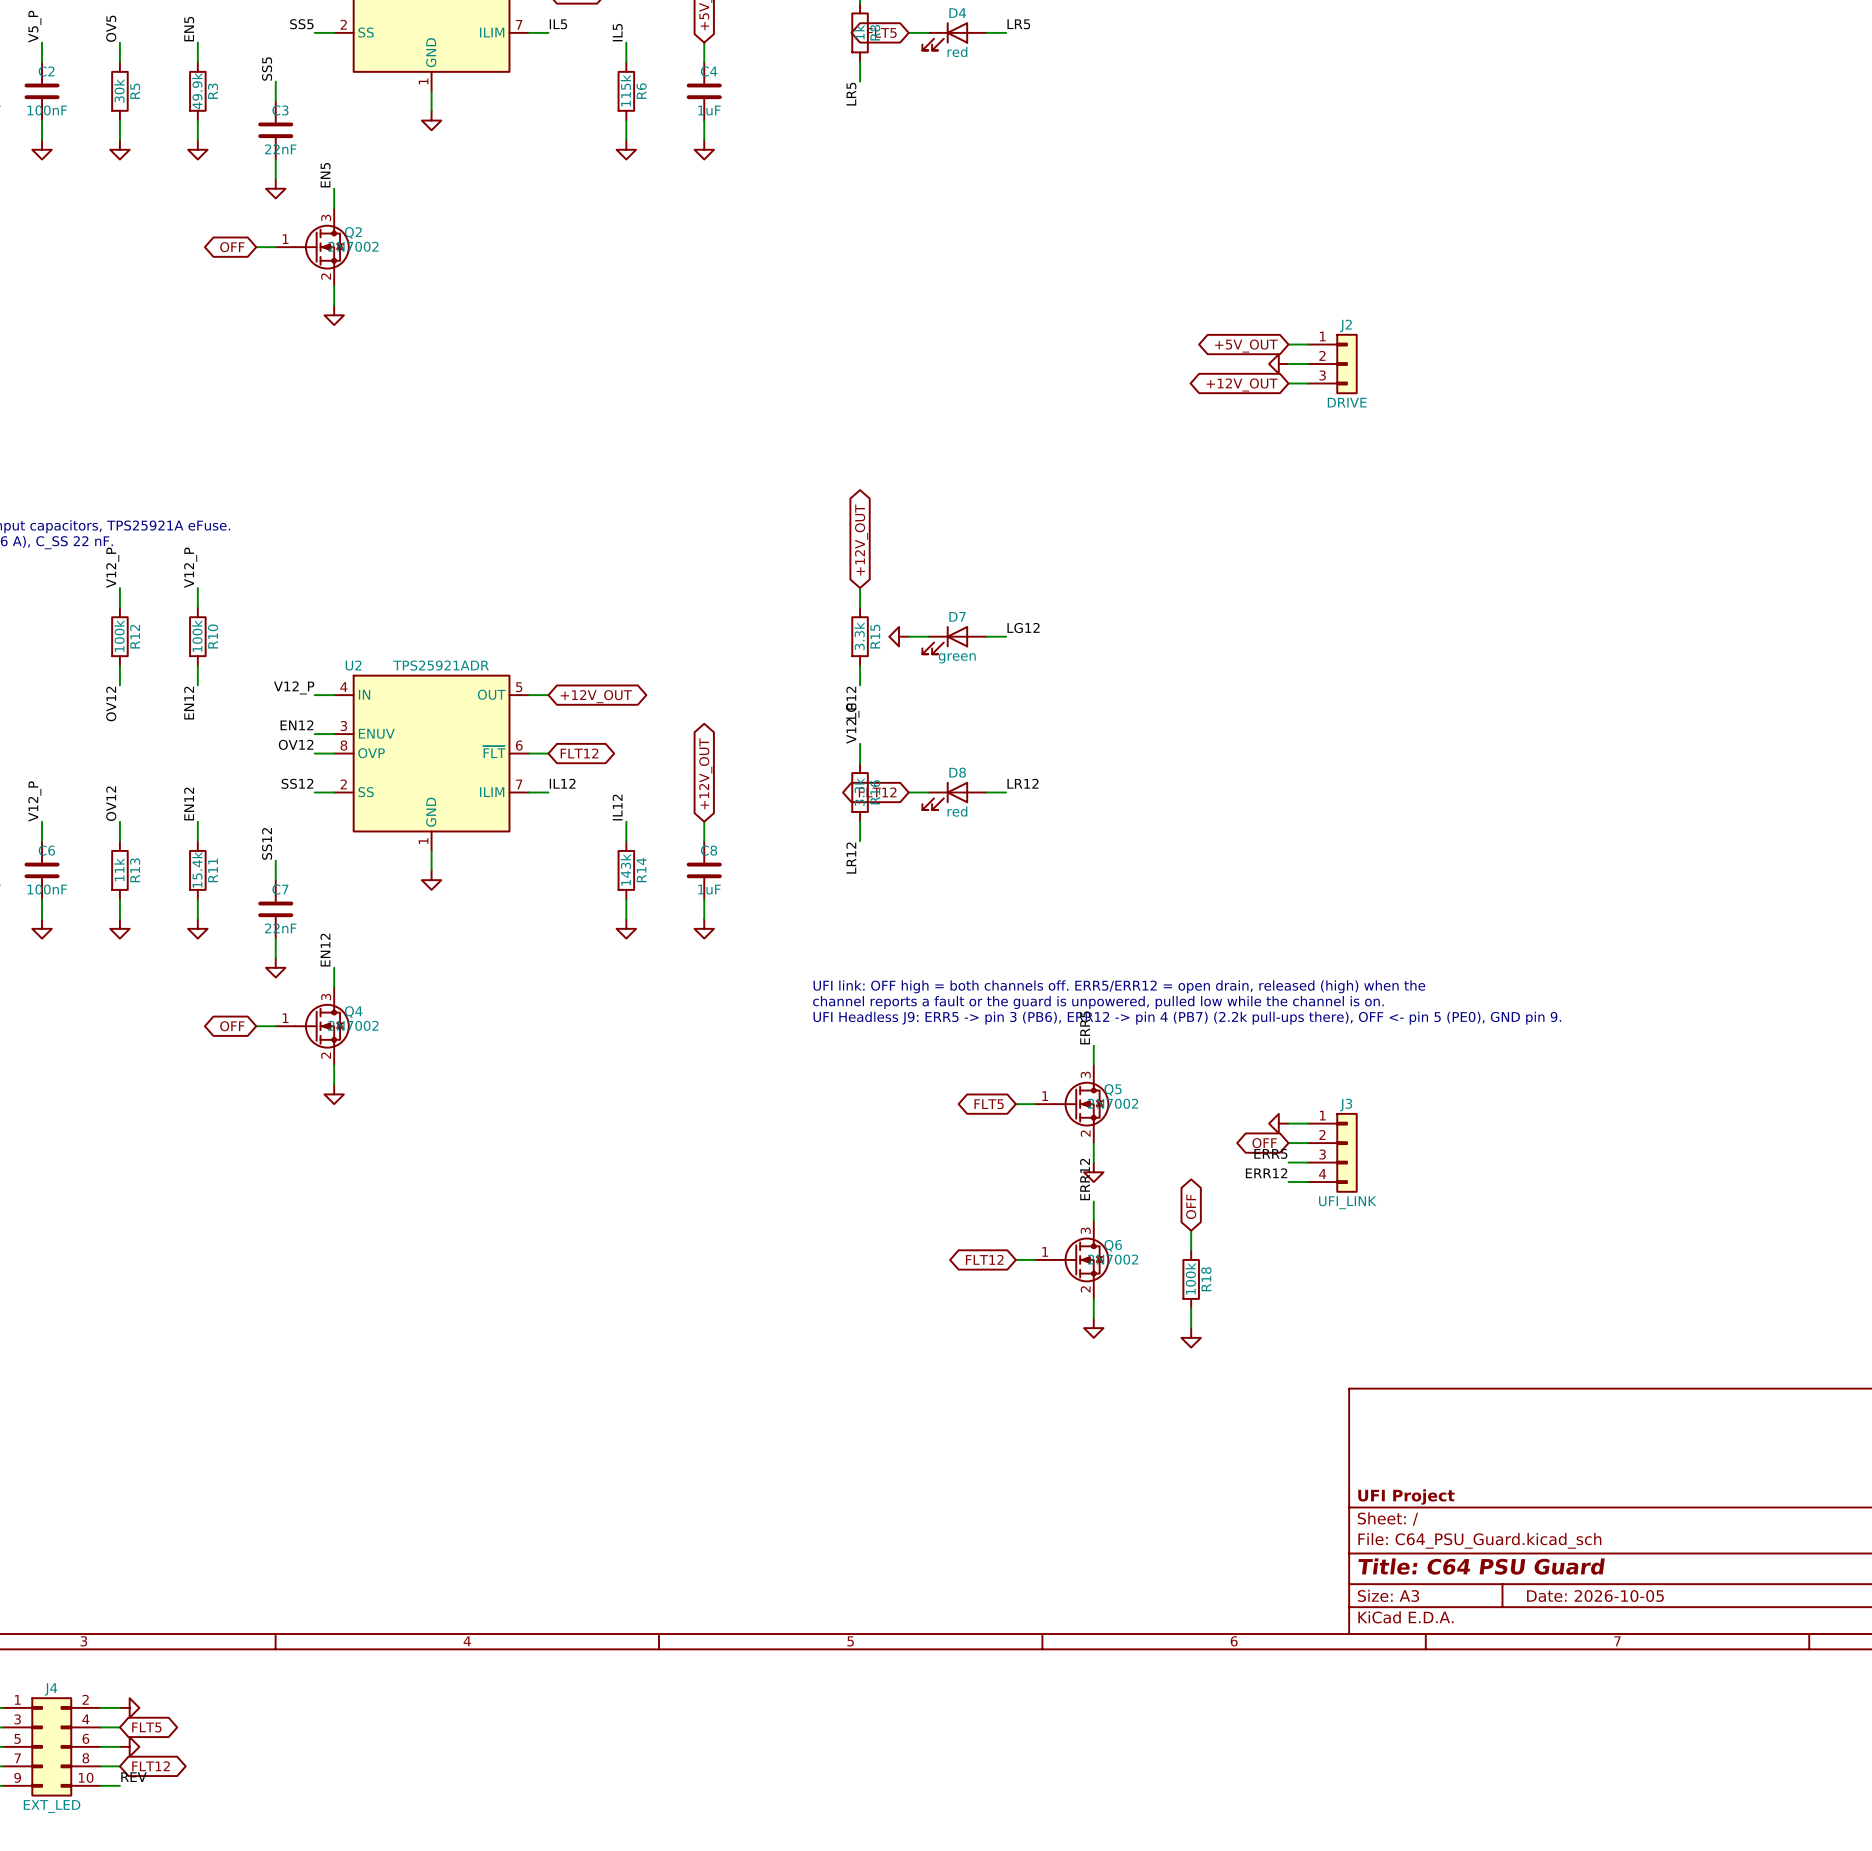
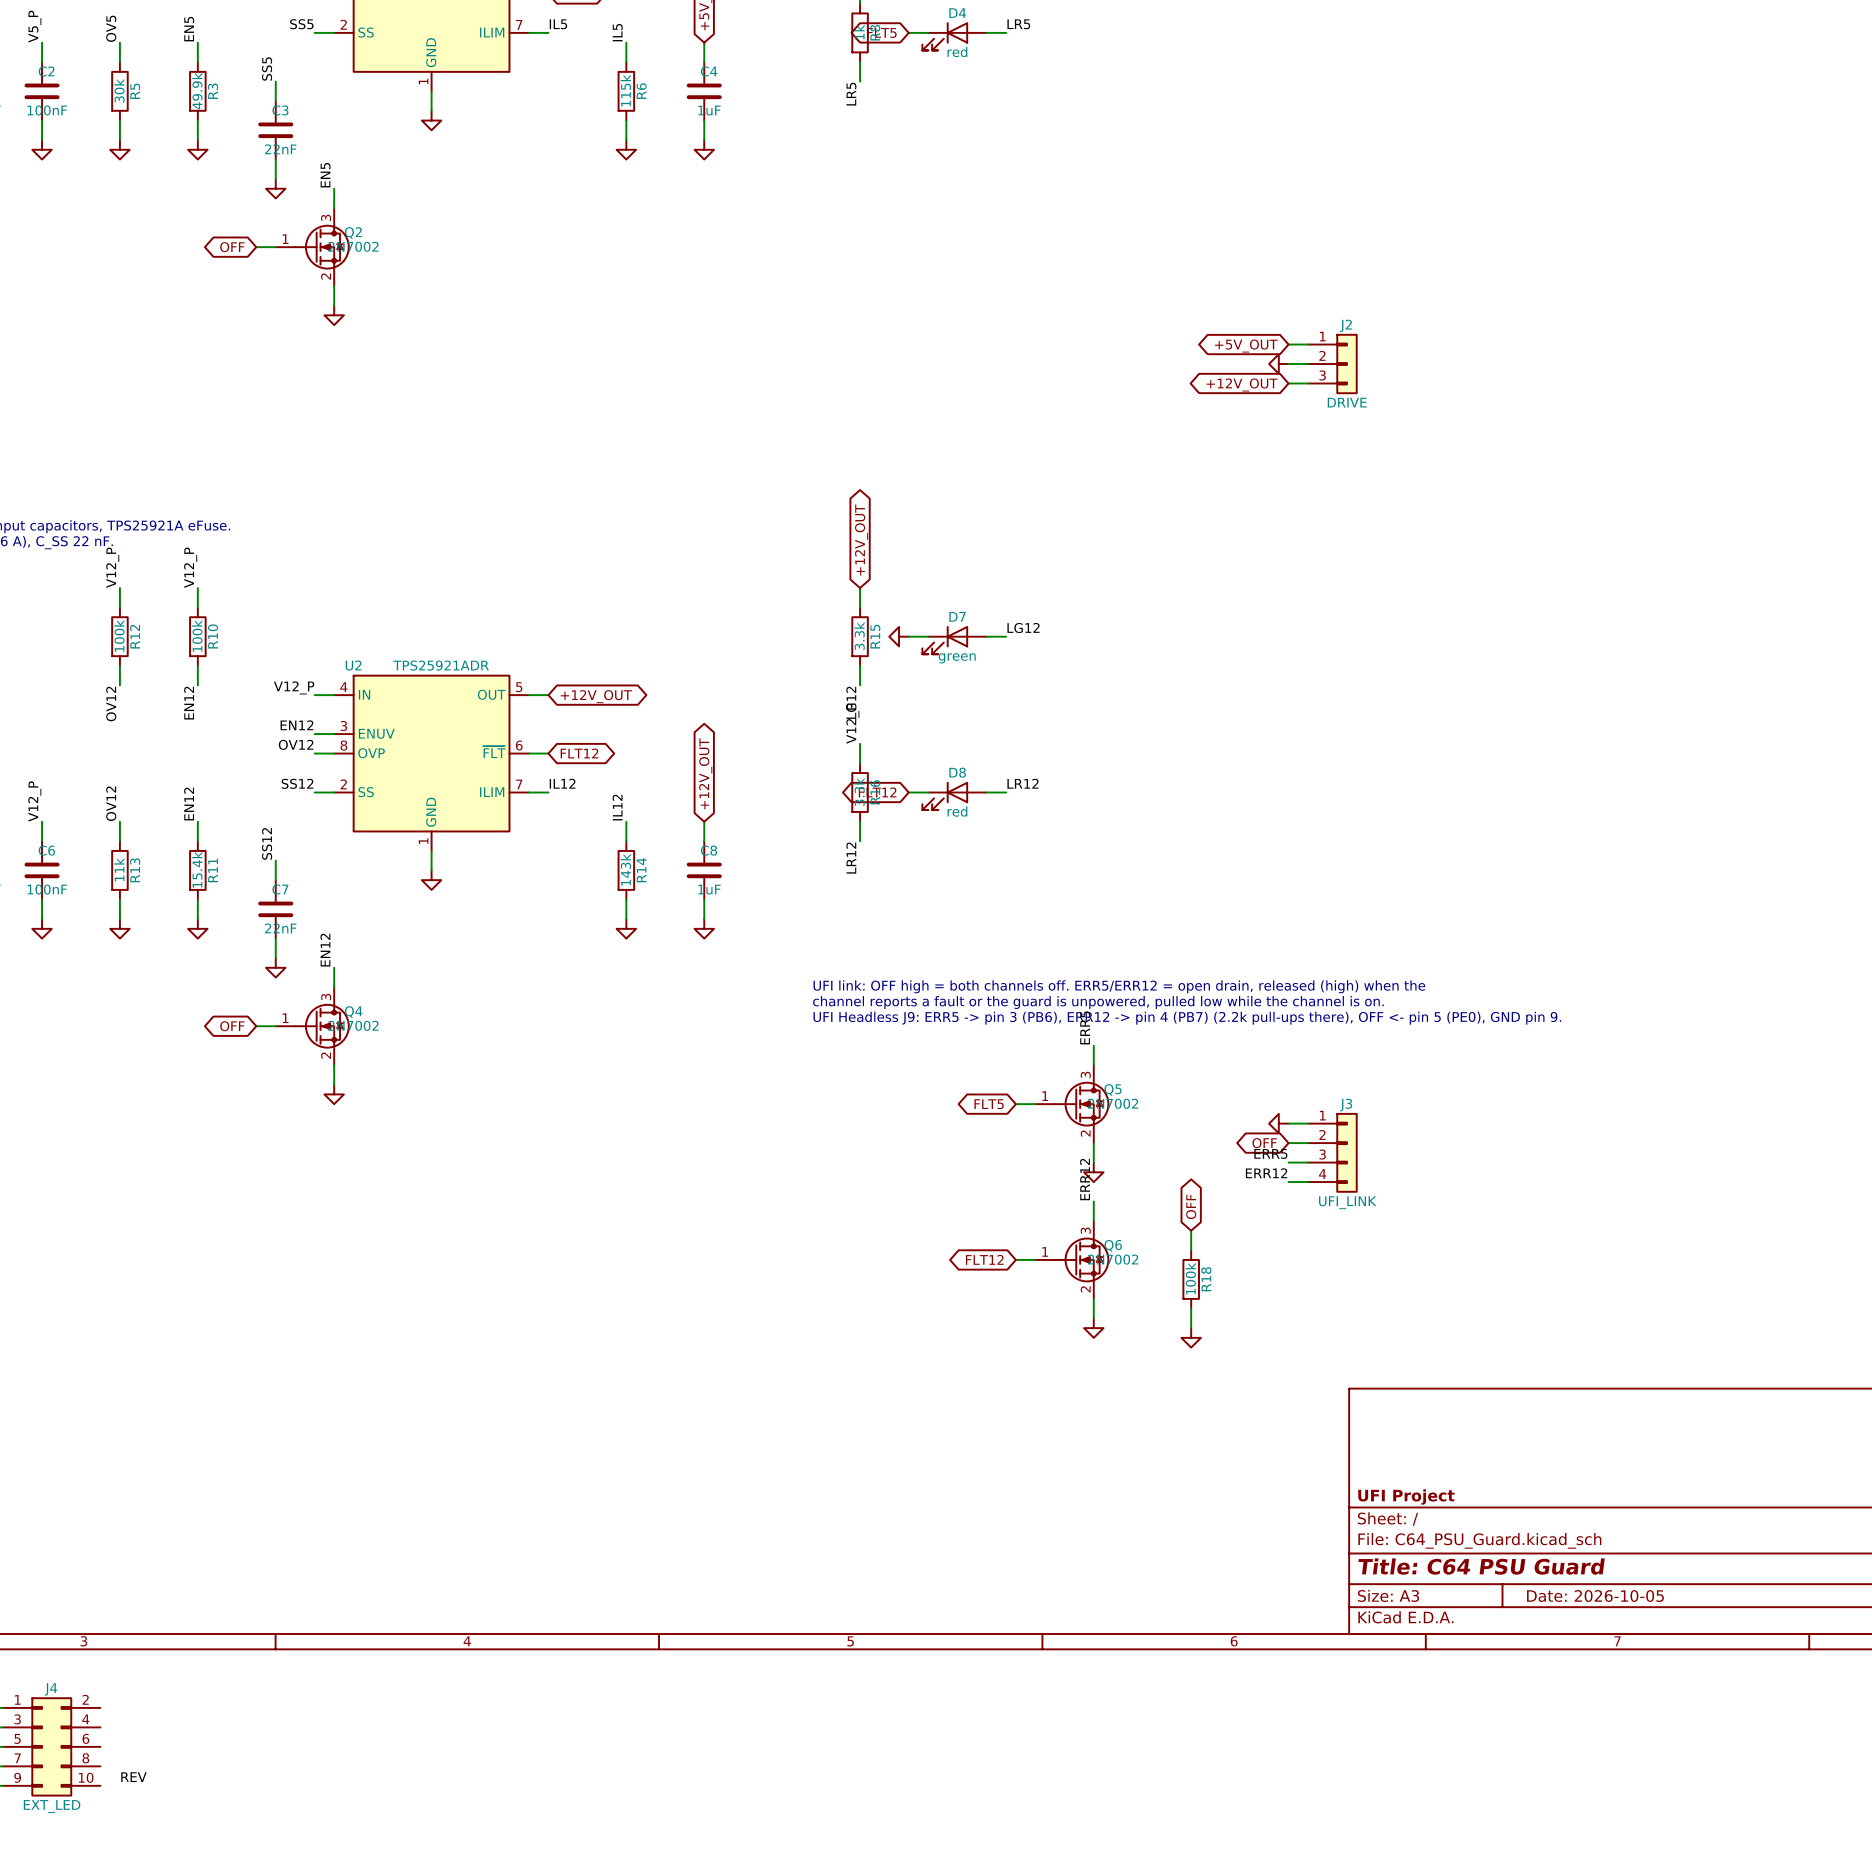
wire: (100, 1707) (119, 1707) -> none
power symbol: (129, 1707) -> none
wire: (100, 1727) (119, 1727) -> none
global label: FLT5 (146, 1727) -> none
wire: (100, 1746) (119, 1746) -> none
power symbol: (129, 1746) -> none
wire: (100, 1766) (119, 1766) -> none
global label: FLT12 (151, 1766) -> none
wire: (100, 1785) (119, 1785) -> none

